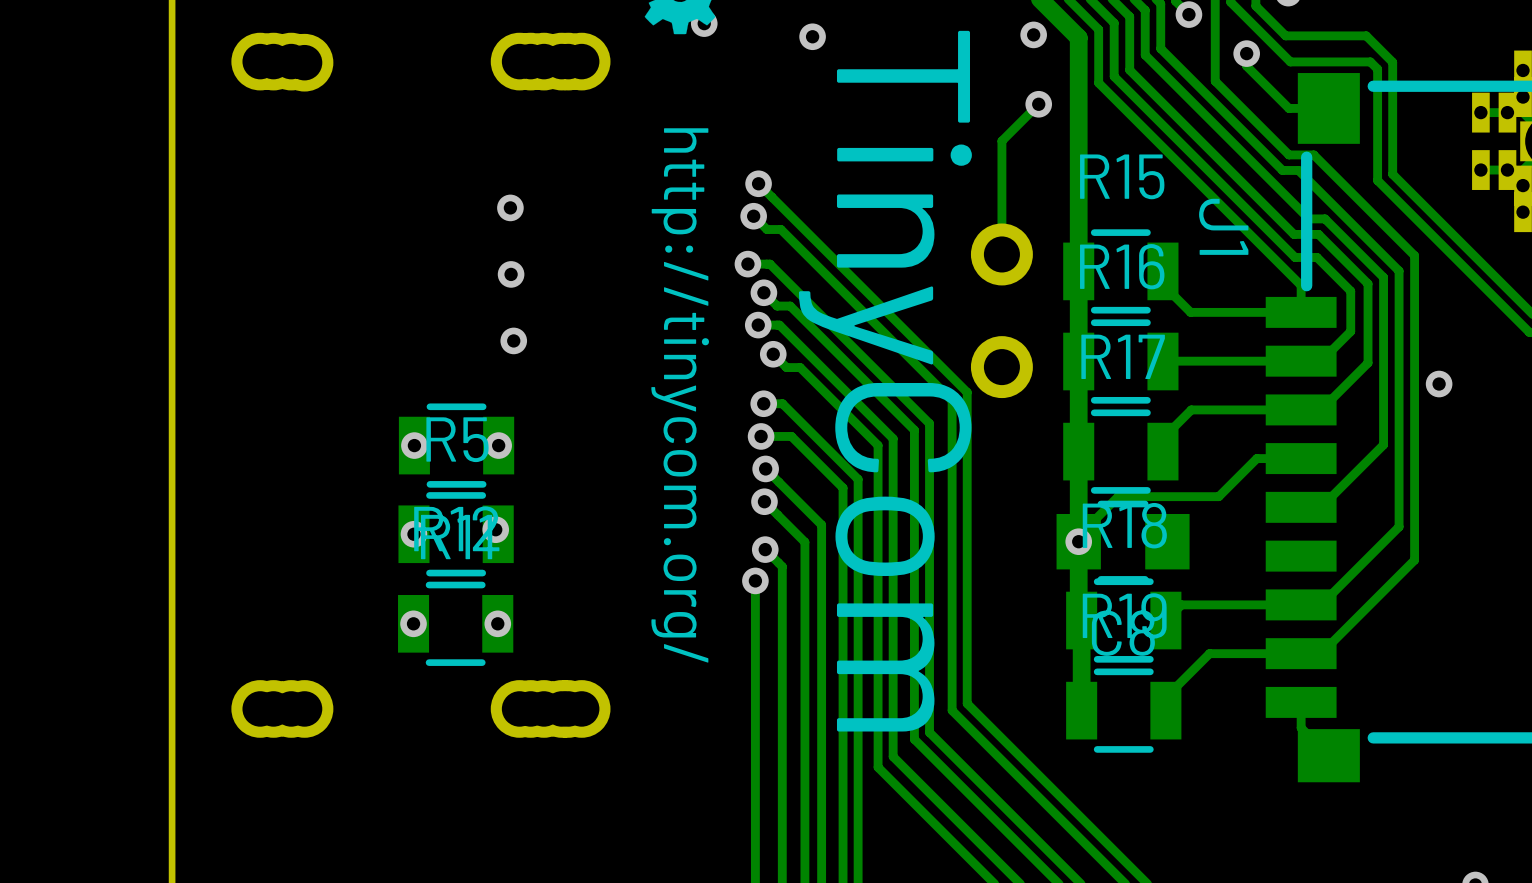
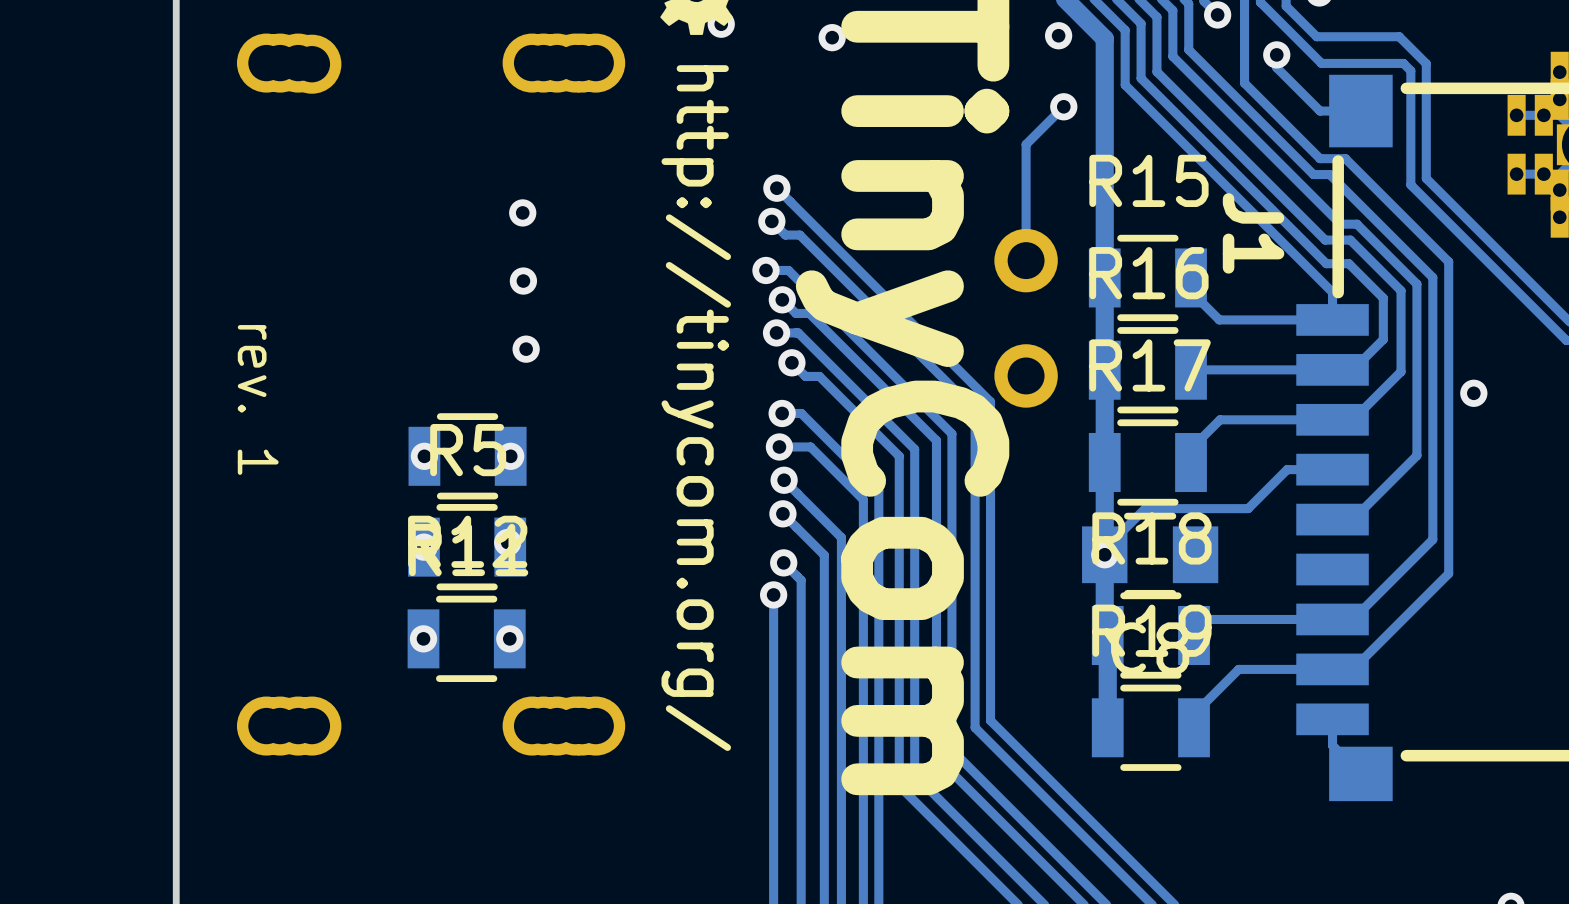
text: none -> rev. 1 (258, 399)

